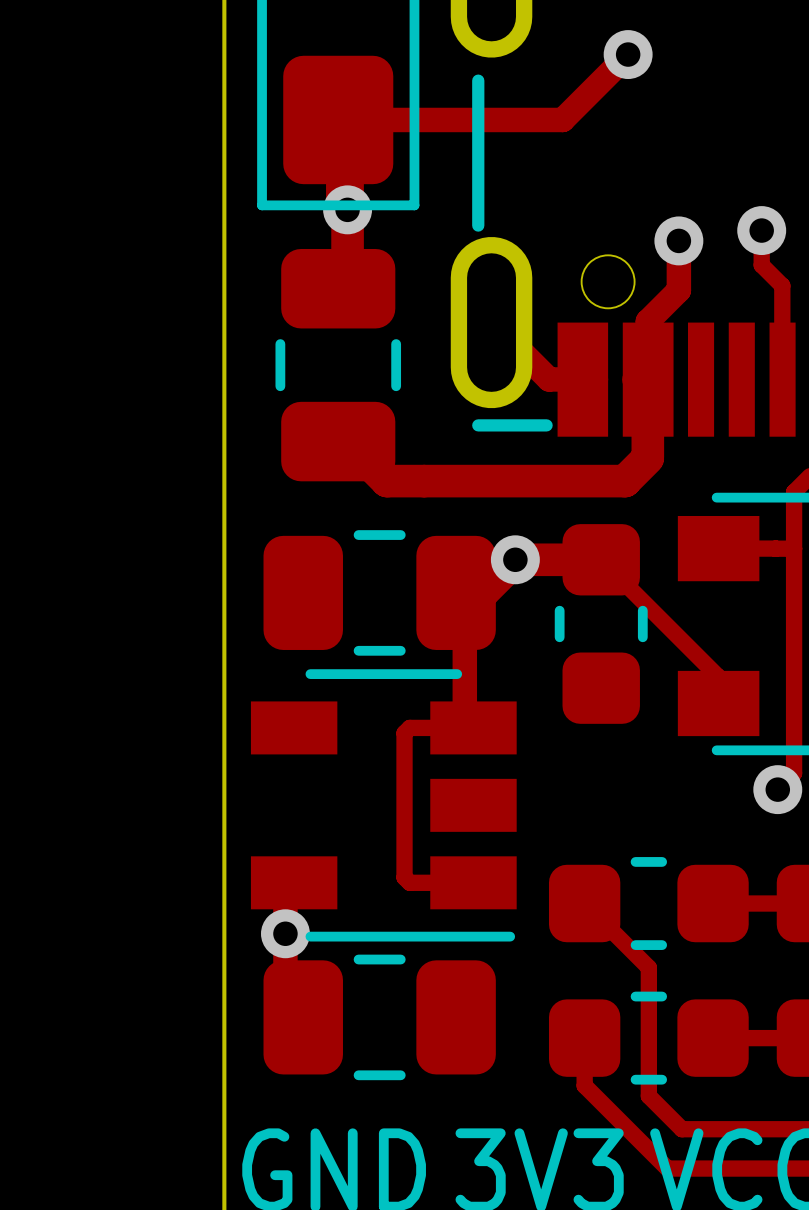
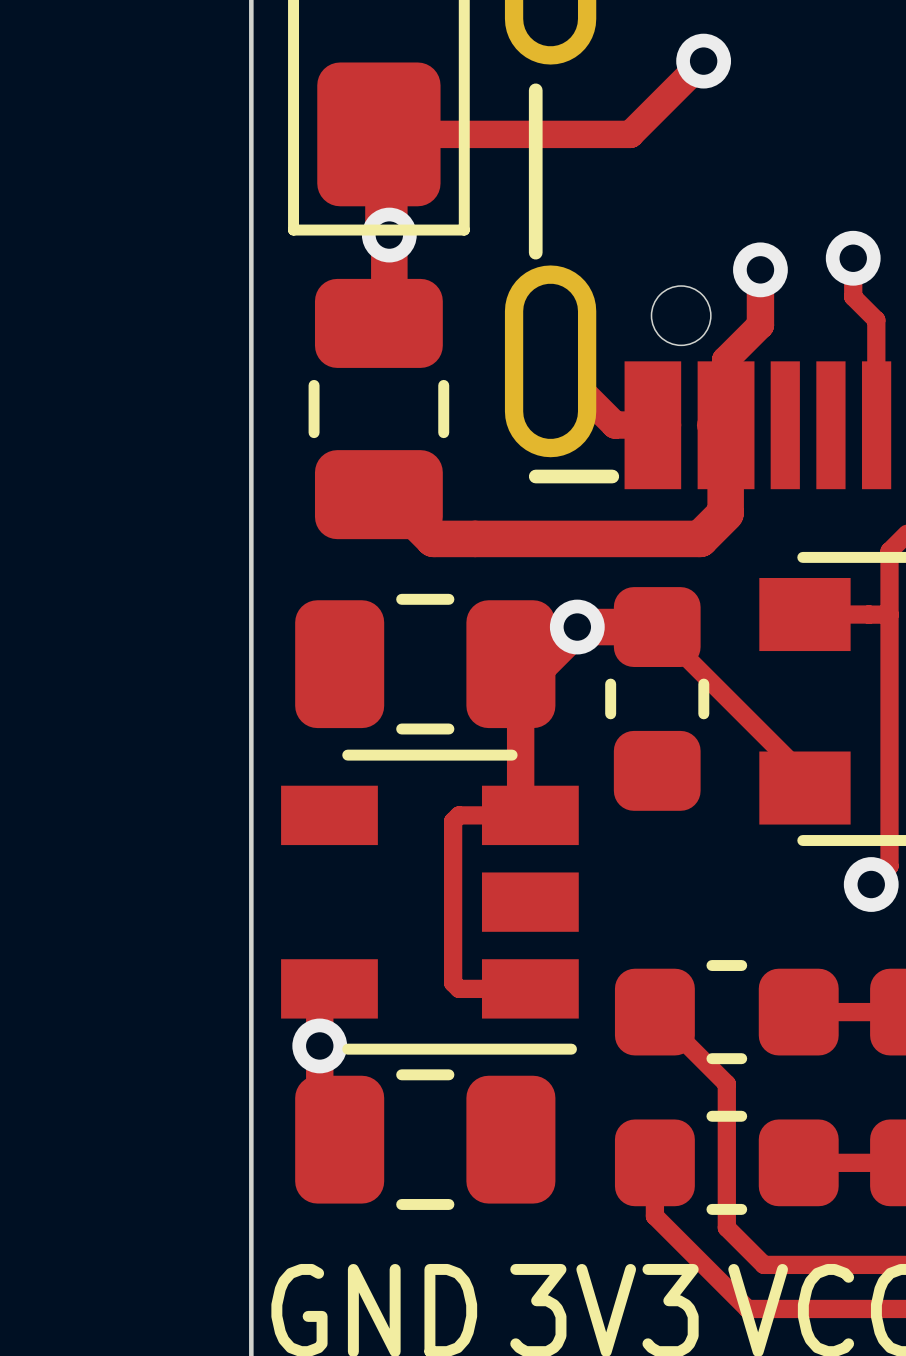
track: (601, 559) (717, 676) (717, 691) -> (656, 627) (803, 774)
part position: (601, 623) -> (657, 698)

